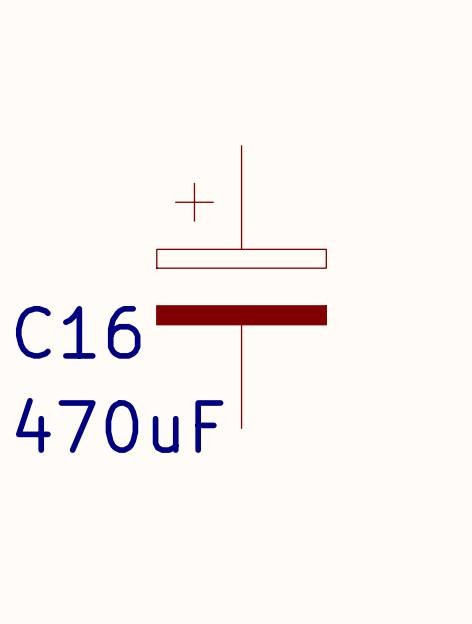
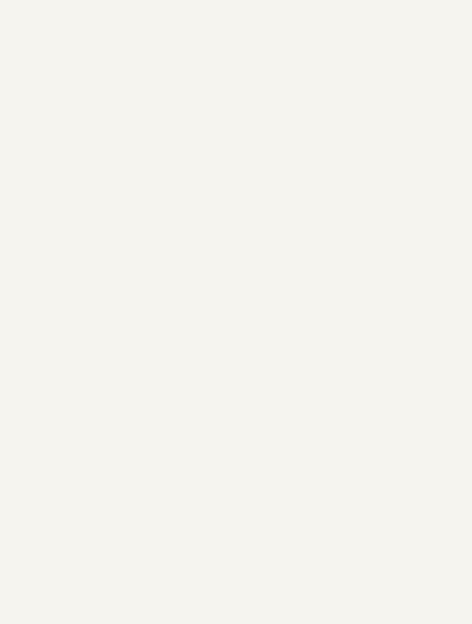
C16: 470uF (241, 287) -> none

